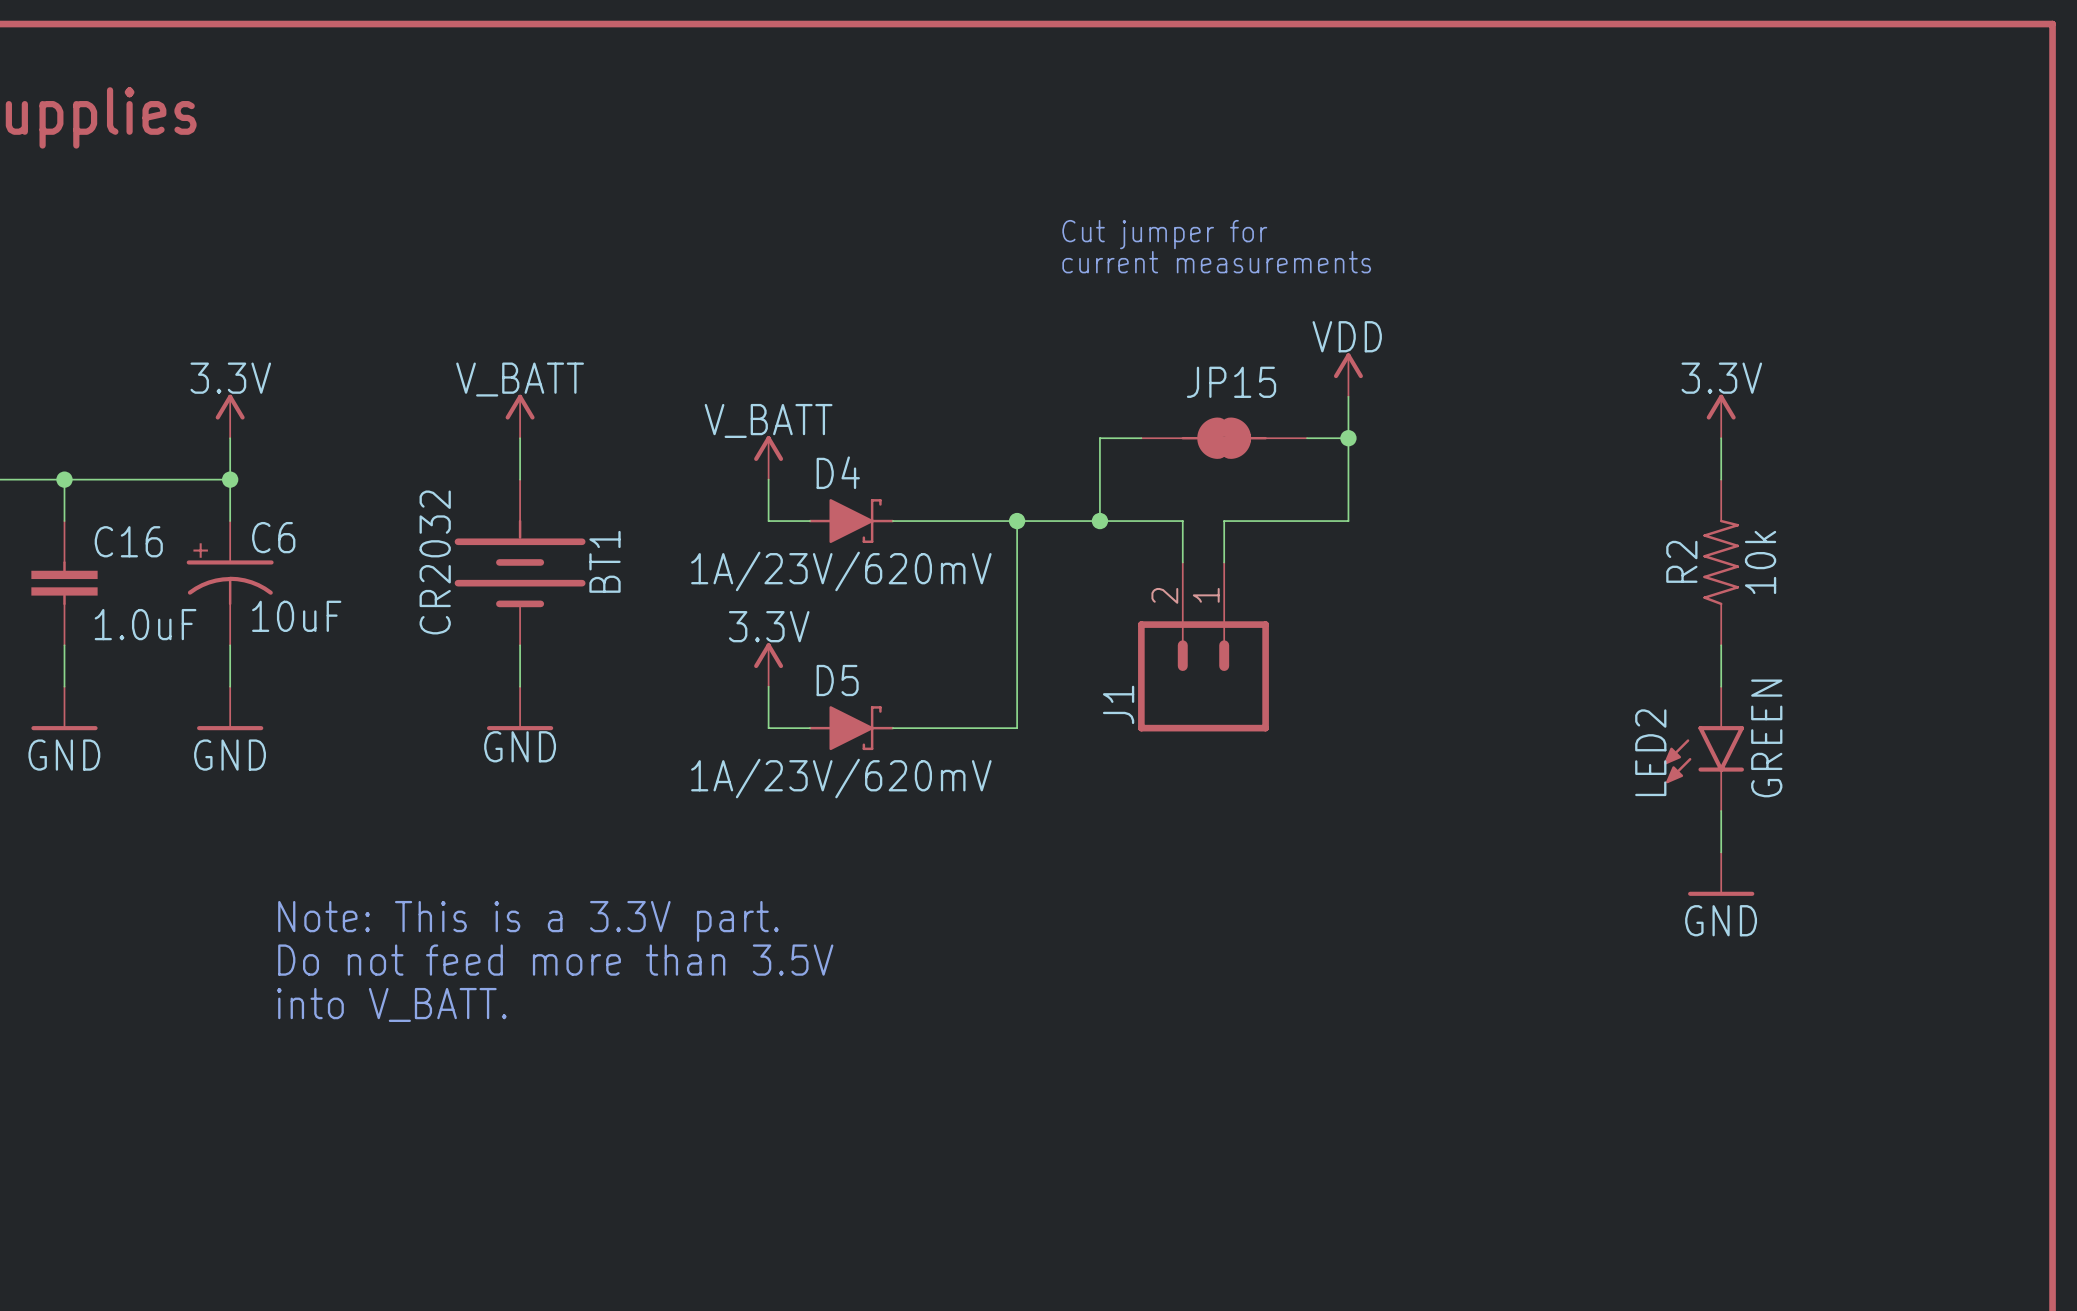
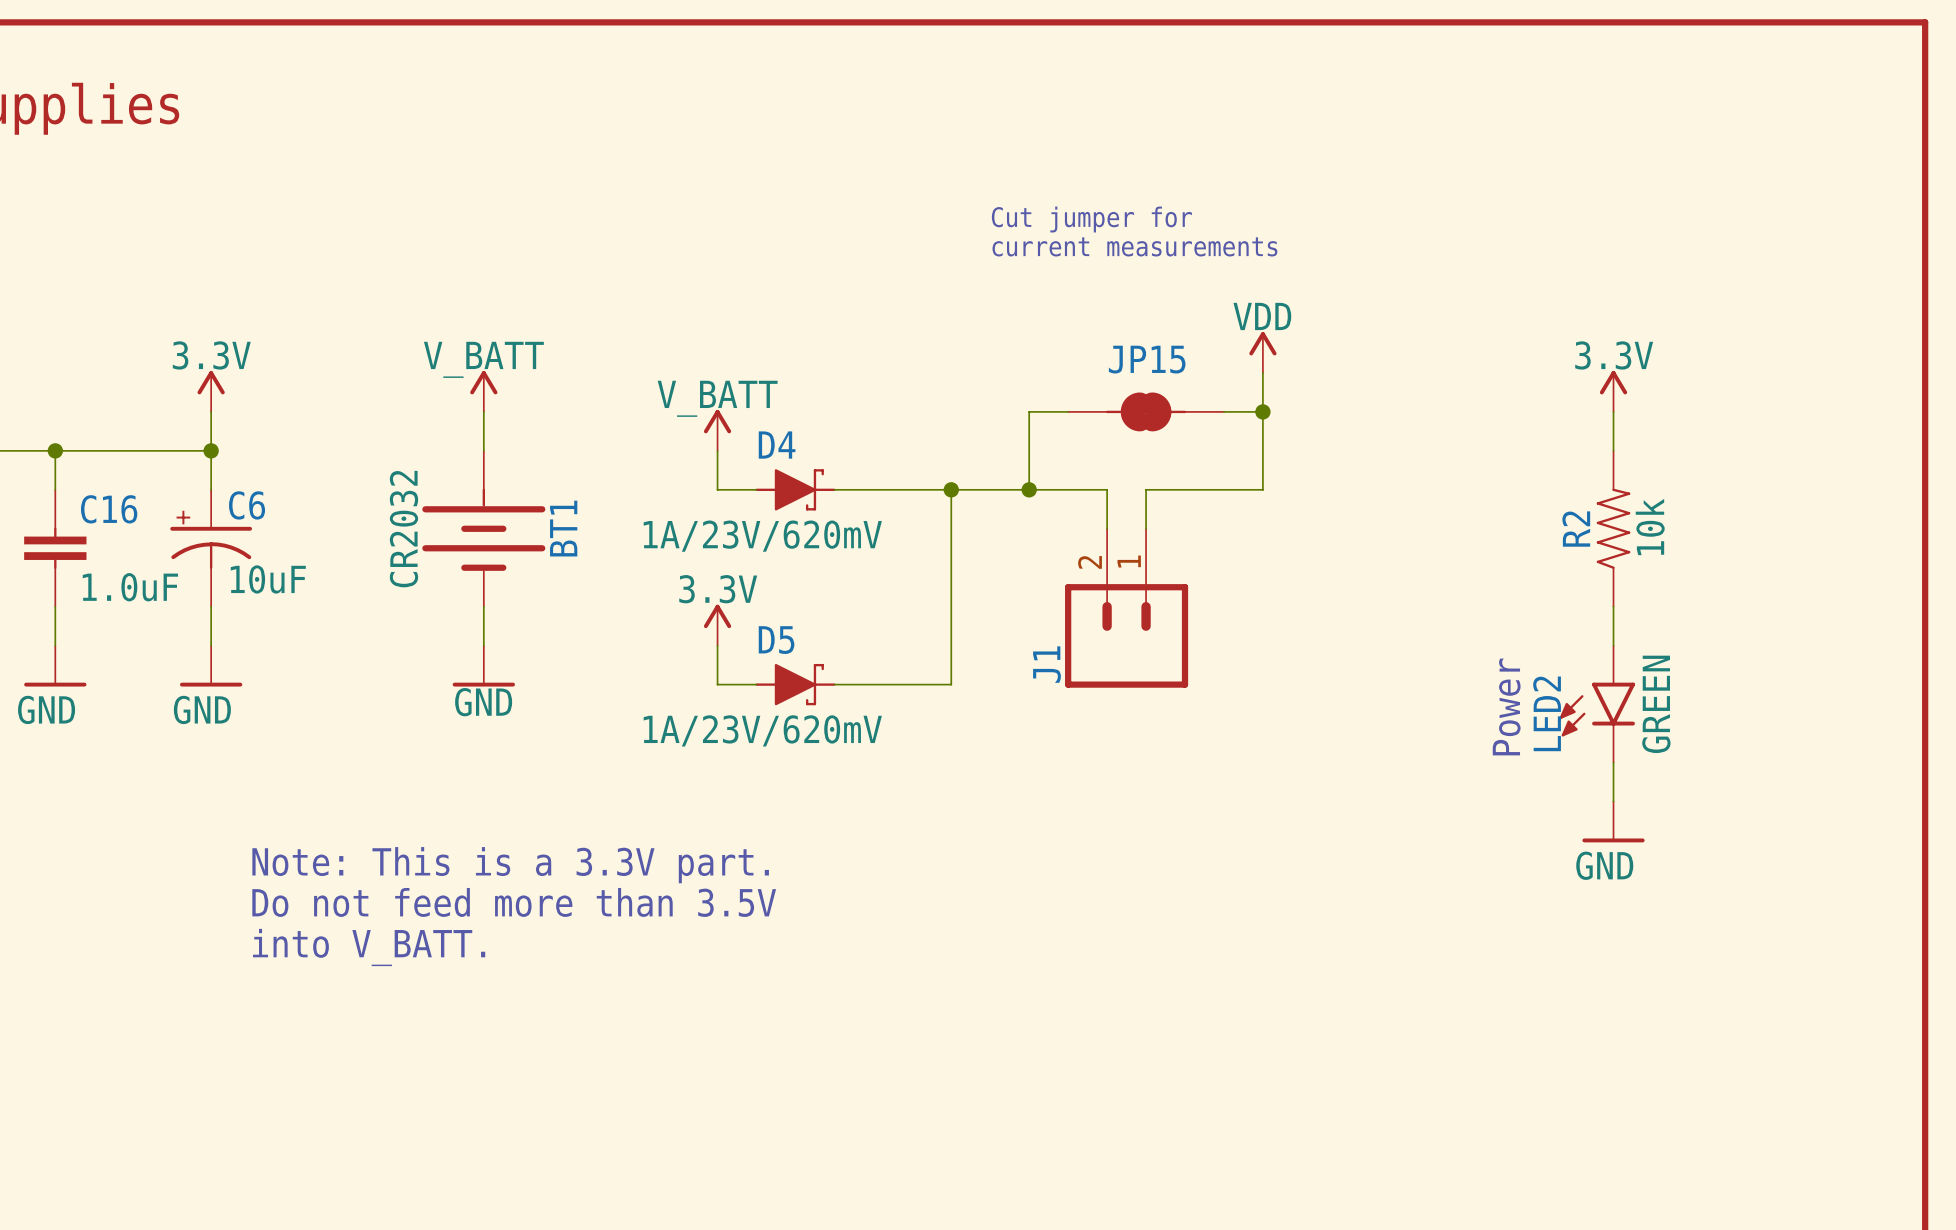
text: none -> Power (1506, 706)

